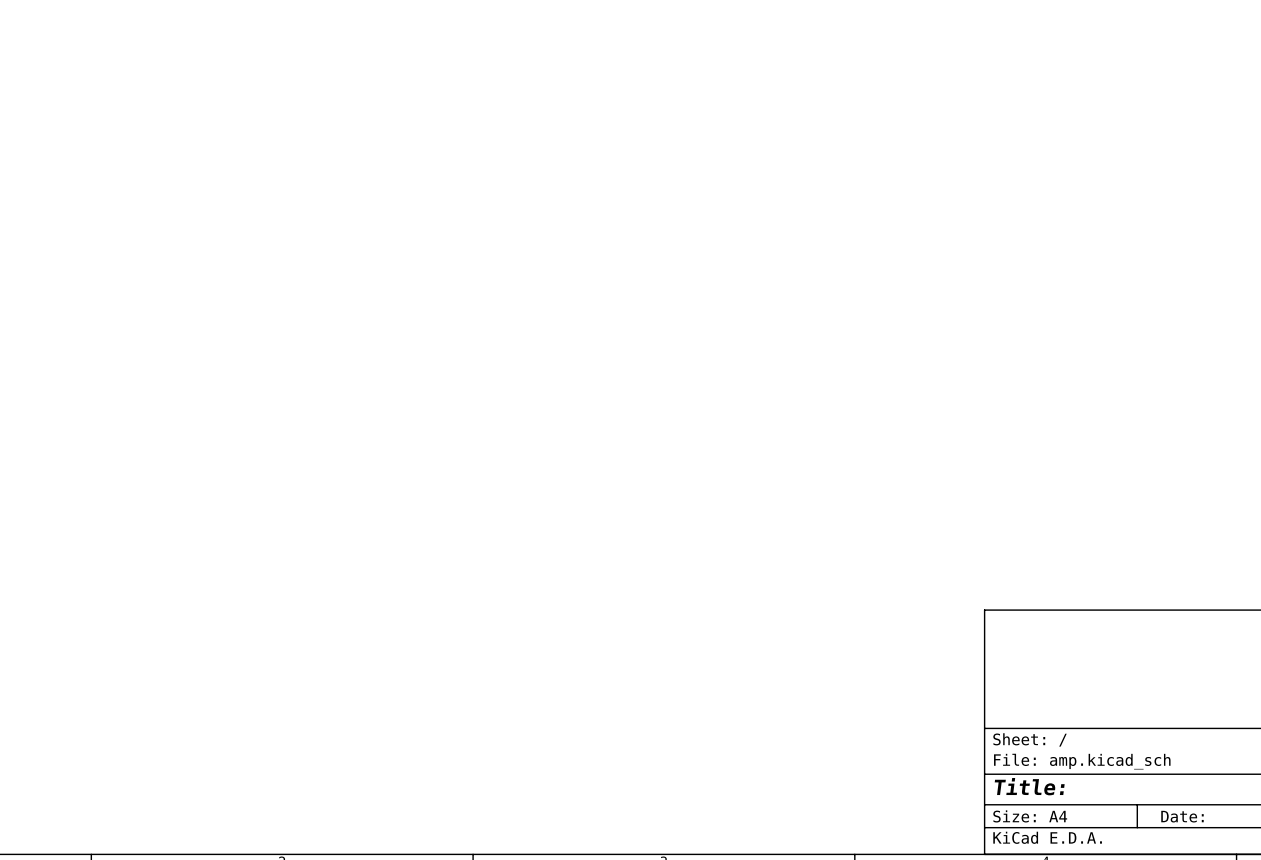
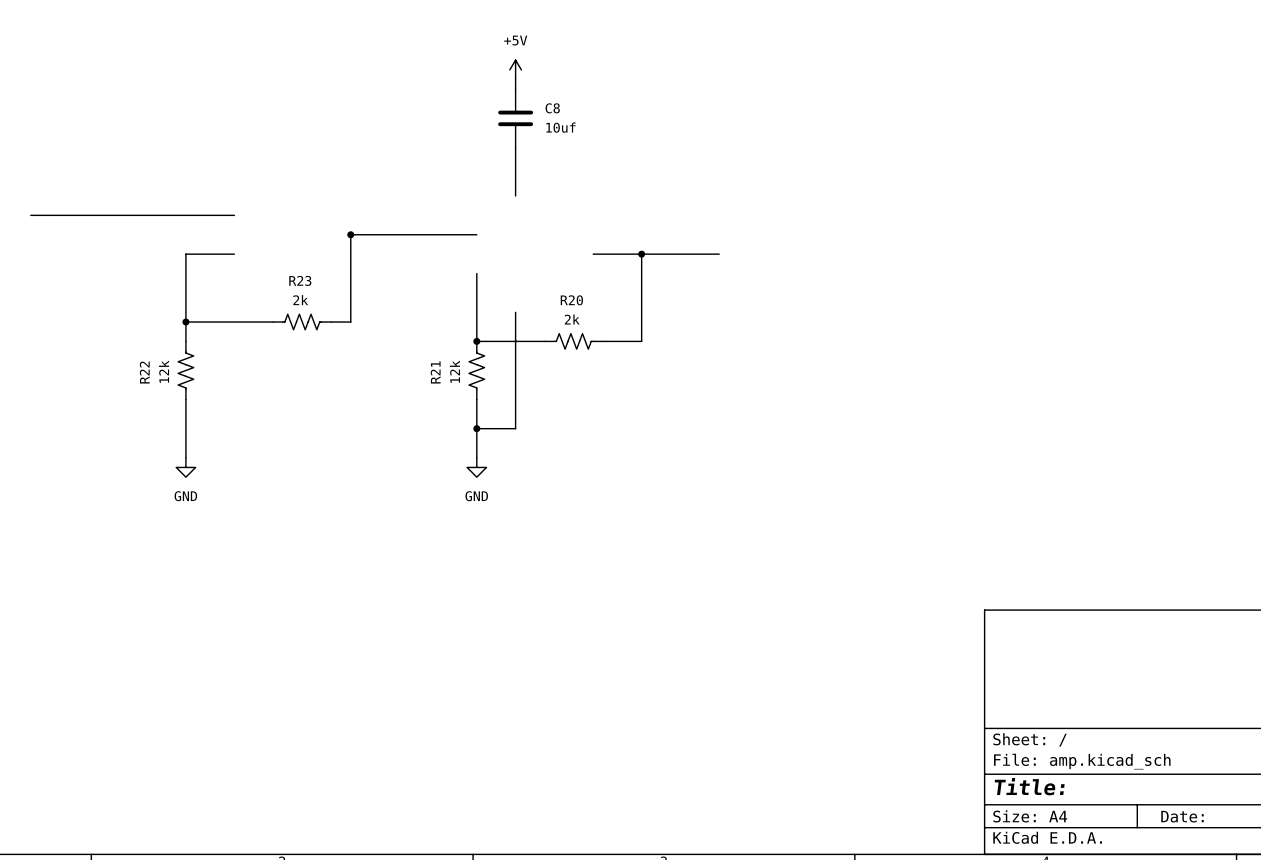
power symbol: none -> +5V (515, 69)
wire: none -> (515, 79) (515, 89)
C8: none -> 10uf (515, 118)
wire: none -> (515, 147) (515, 195)
wire: none -> (30, 215) (234, 215)
junction: none -> (350, 234)
wire: none -> (476, 234) (350, 234) (350, 322) (331, 322)
wire: none -> (234, 254) (185, 254) (185, 341)
wire: none -> (593, 254) (719, 254)
wire: none -> (641, 254) (641, 341) (602, 341)
junction: none -> (641, 254)
wire: none -> (476, 273) (476, 341) (544, 341)
wire: none -> (515, 312) (515, 428) (476, 428)
wire: none -> (185, 322) (273, 322)
junction: none -> (185, 322)
R23: none -> 2k (302, 322)
junction: none -> (476, 341)
R20: none -> 2k (573, 341)
R22: none -> 12k (185, 370)
R21: none -> 12k (476, 370)
wire: none -> (185, 399) (185, 457)
wire: none -> (476, 399) (476, 457)
junction: none -> (476, 428)
power symbol: none -> GND (185, 467)
power symbol: none -> GND (476, 467)

